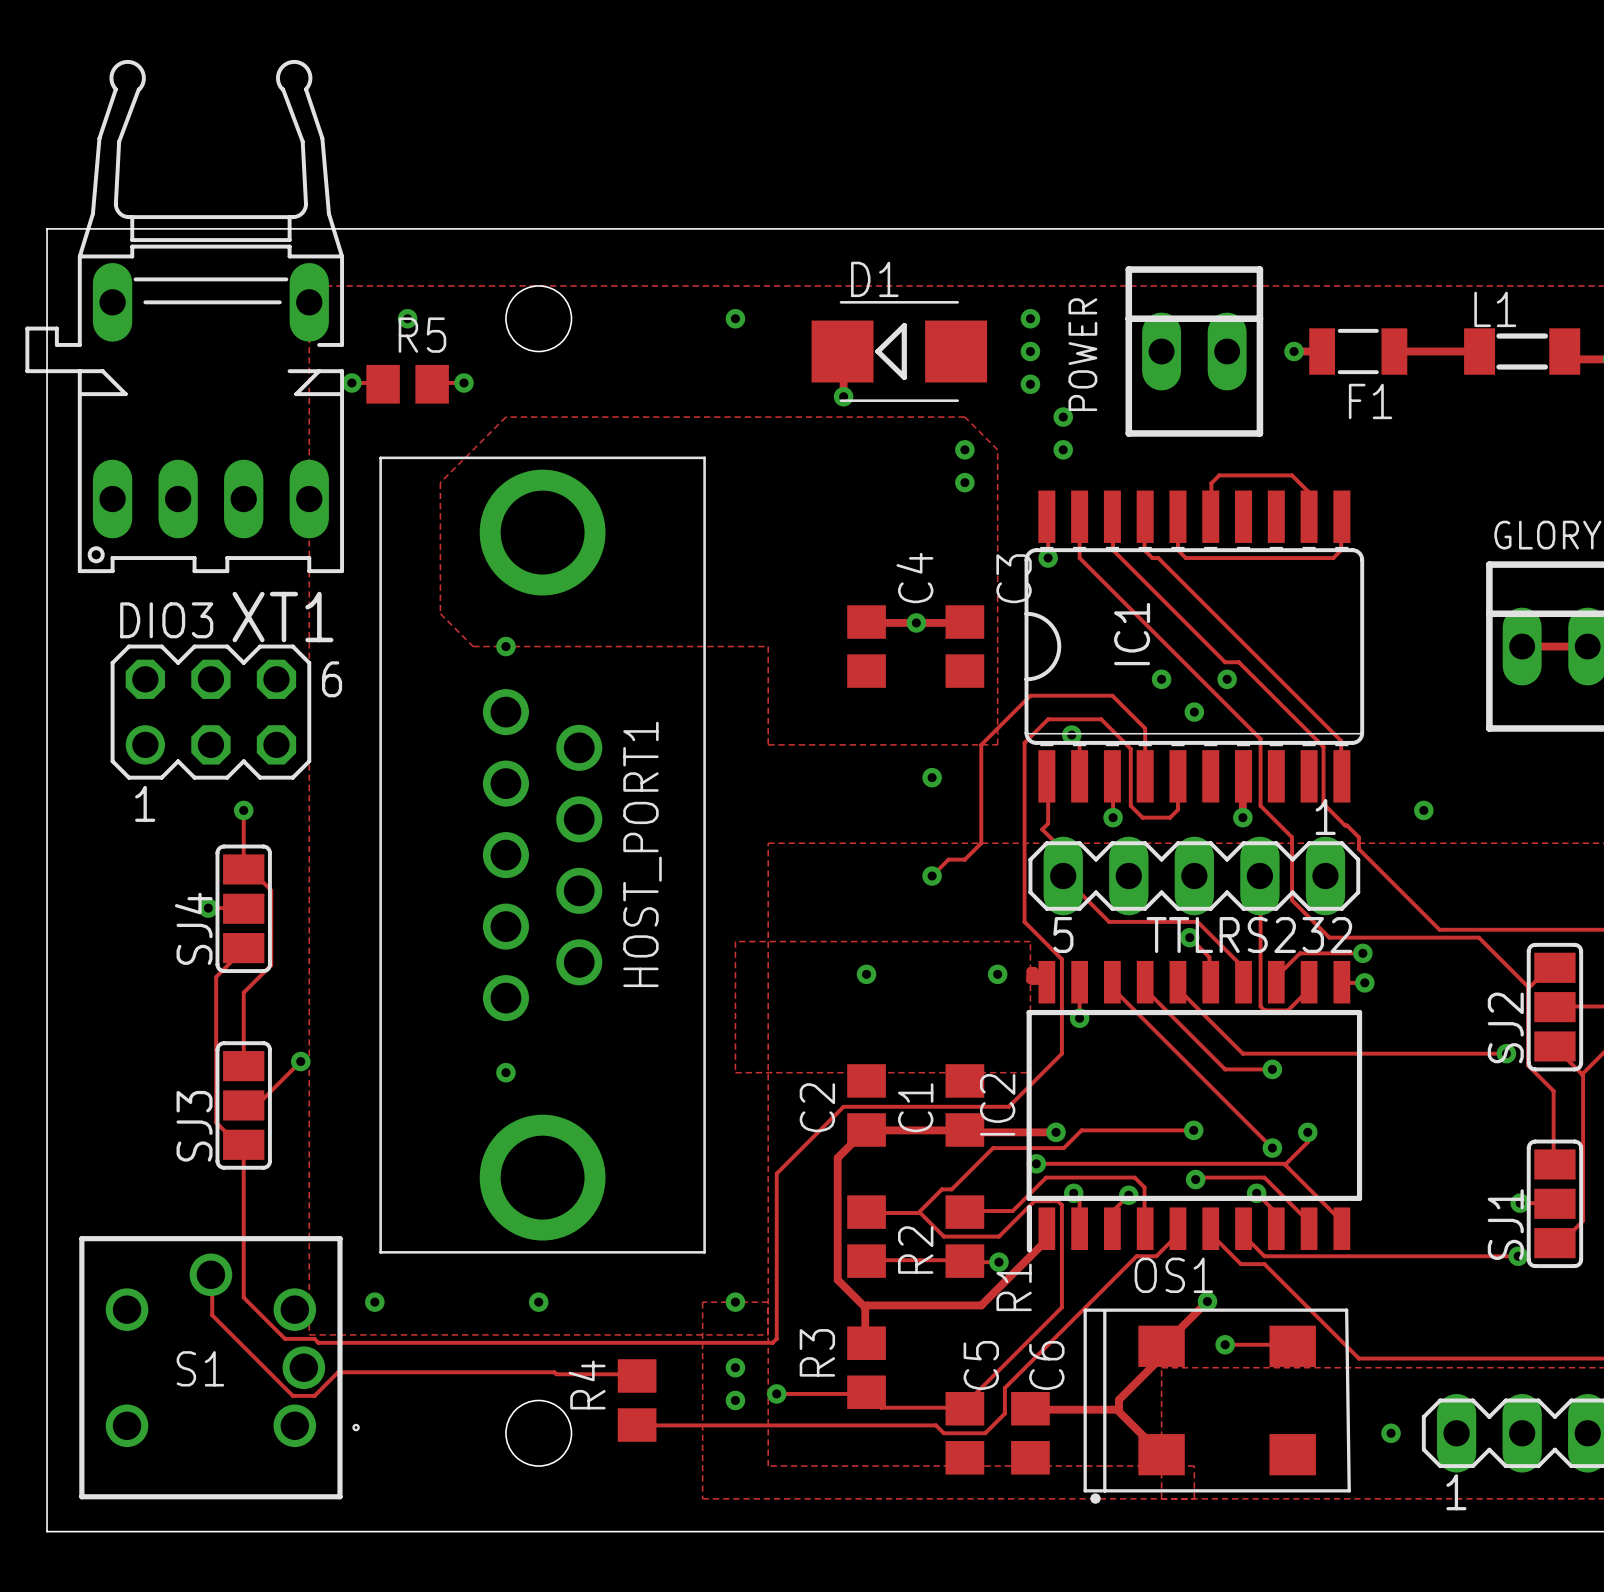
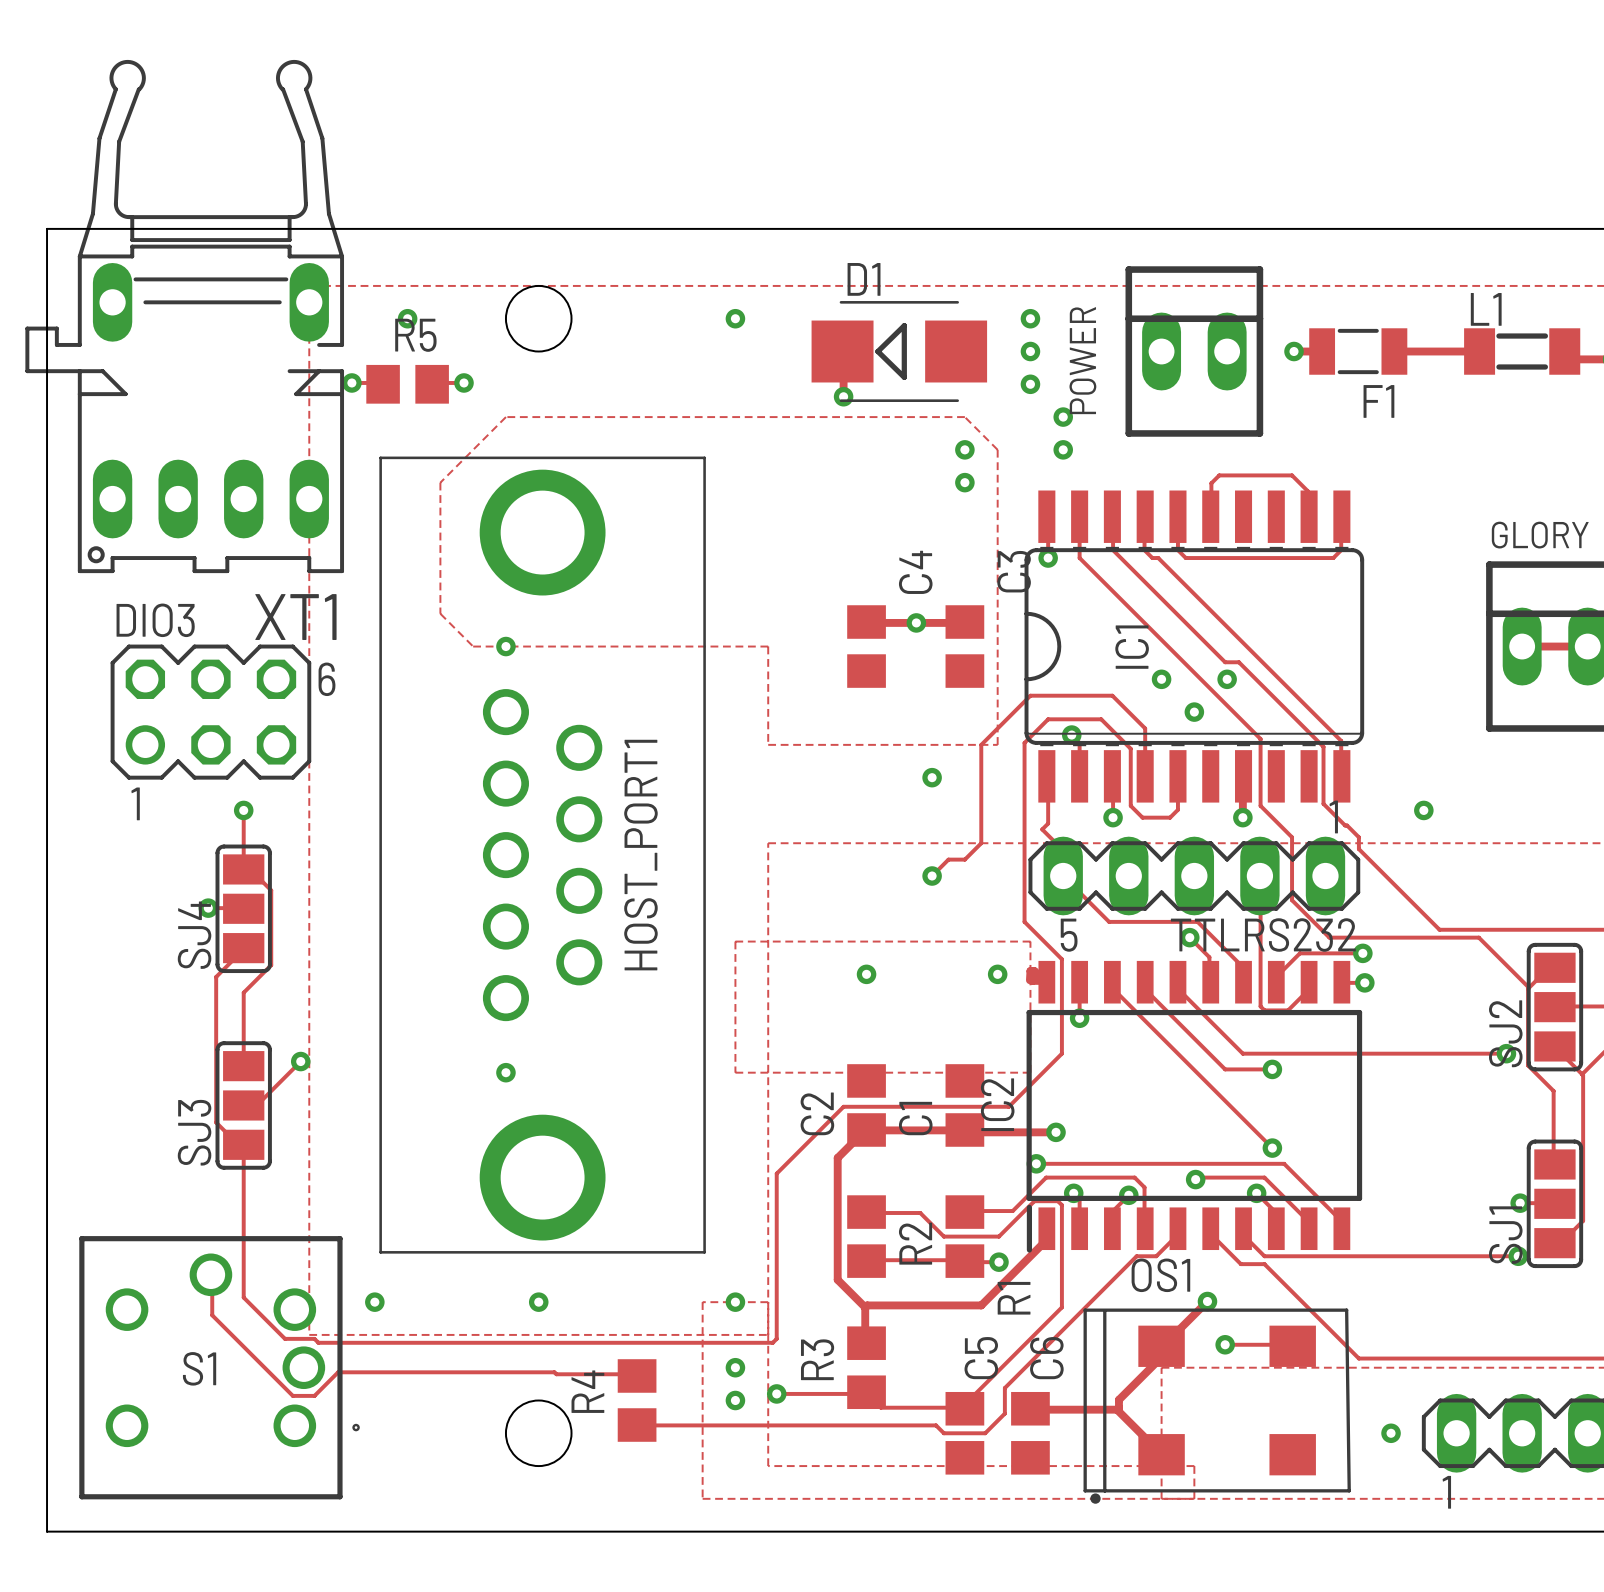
track: (1193, 1130) (1081, 1130) (1063, 1148) (993, 1148) (951, 1189) (941, 1189) (918, 1212) -> none
via: (1193, 1130) -> none
track: (1307, 1132) (1307, 1142) (1285, 1164) -> none
via: (1307, 1132) -> none

